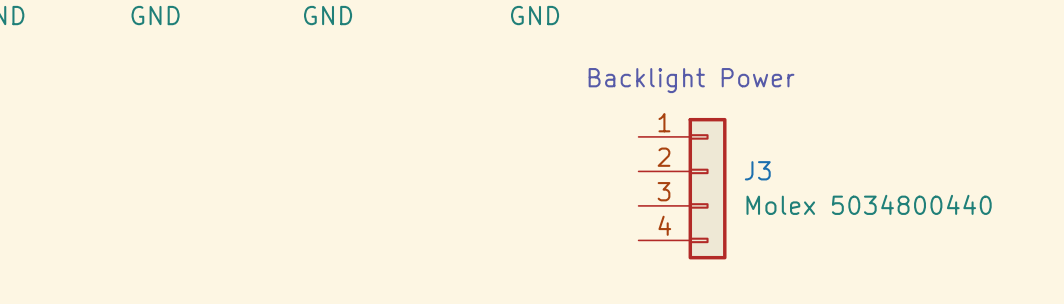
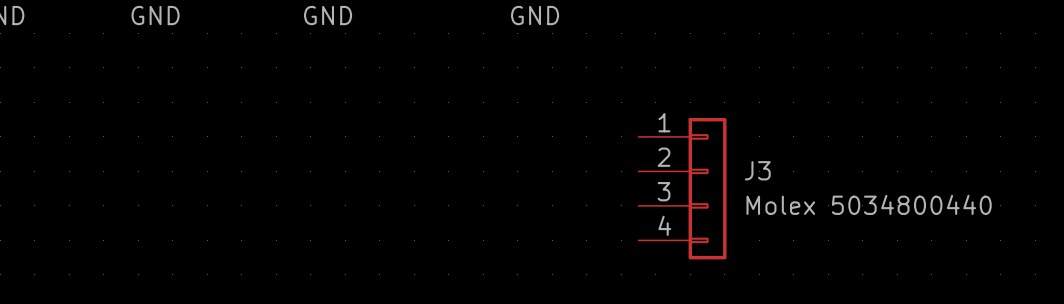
text: Backlight Power (691, 80) -> none

